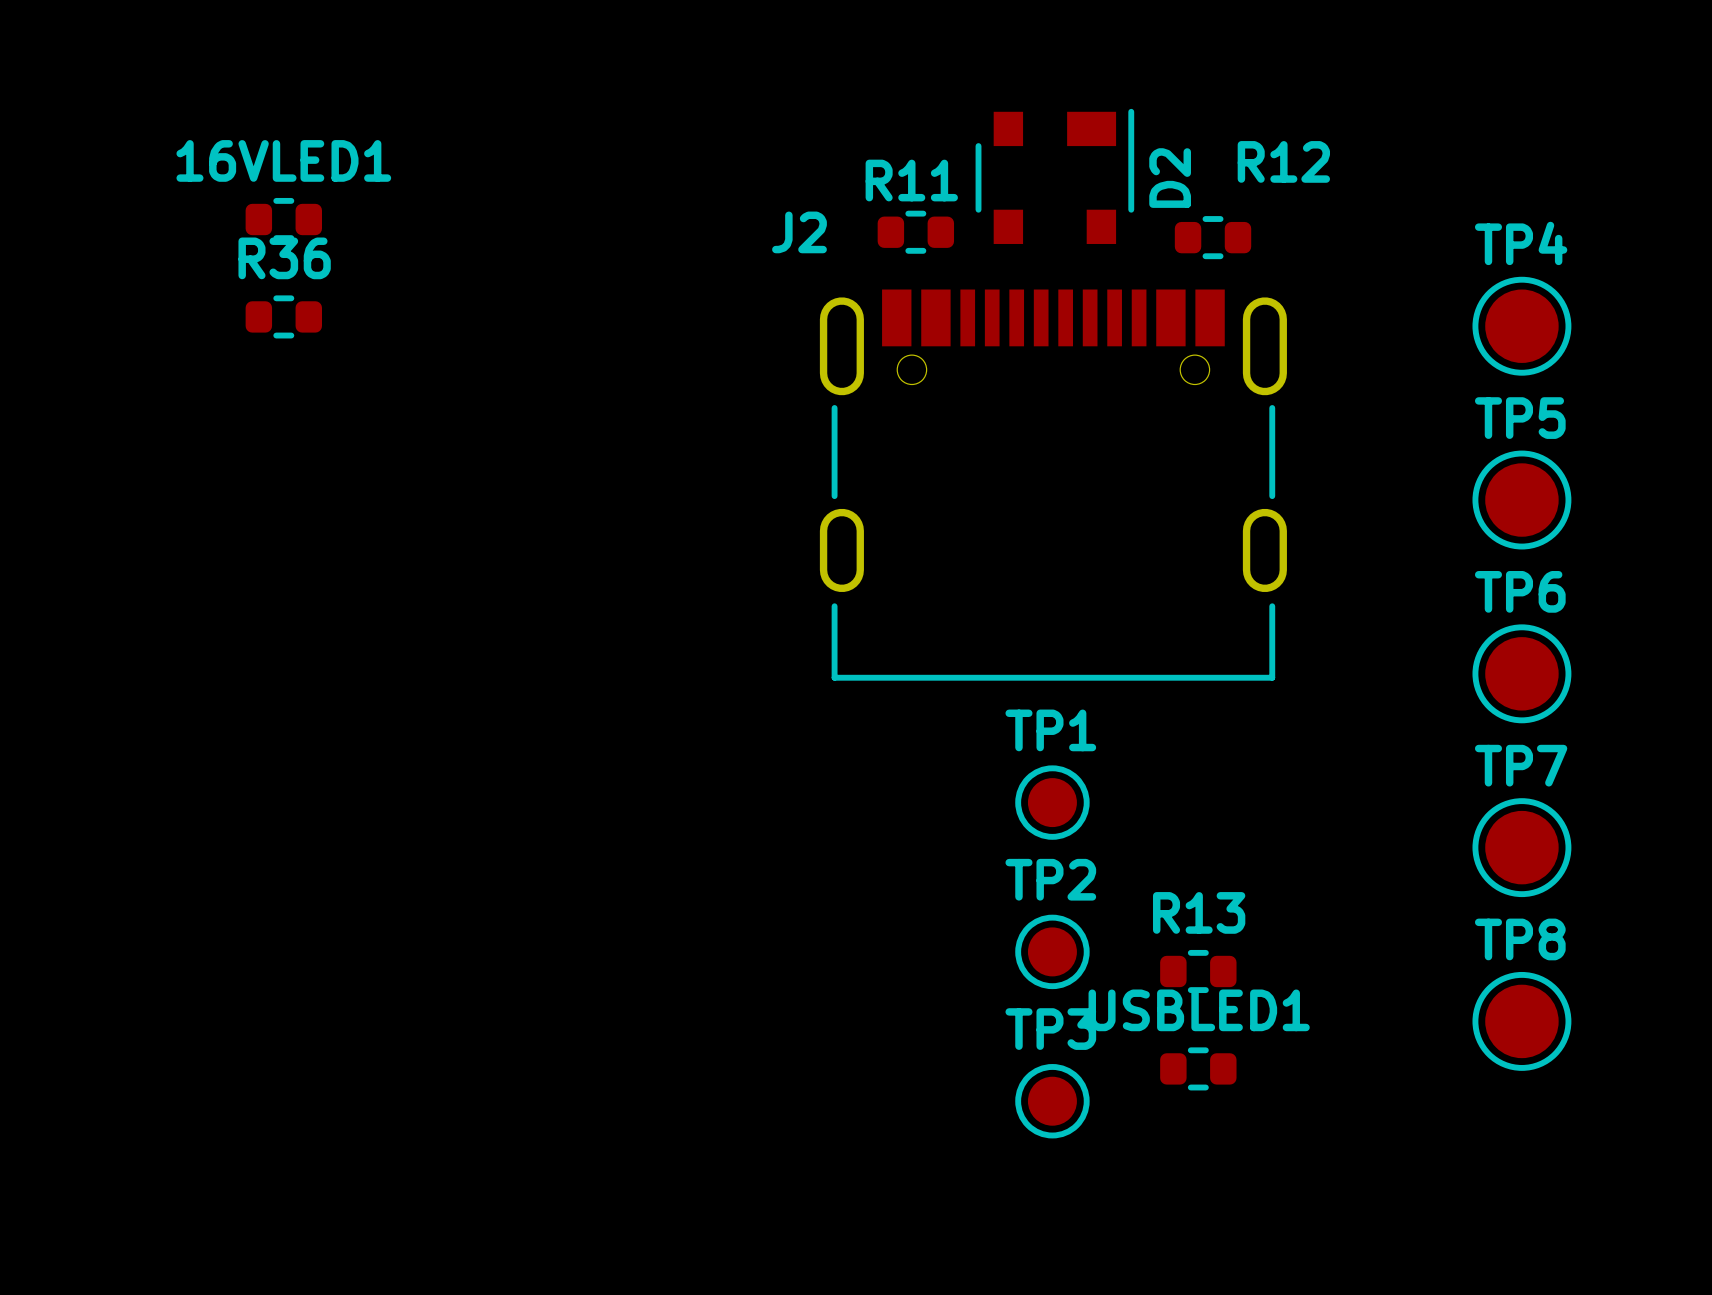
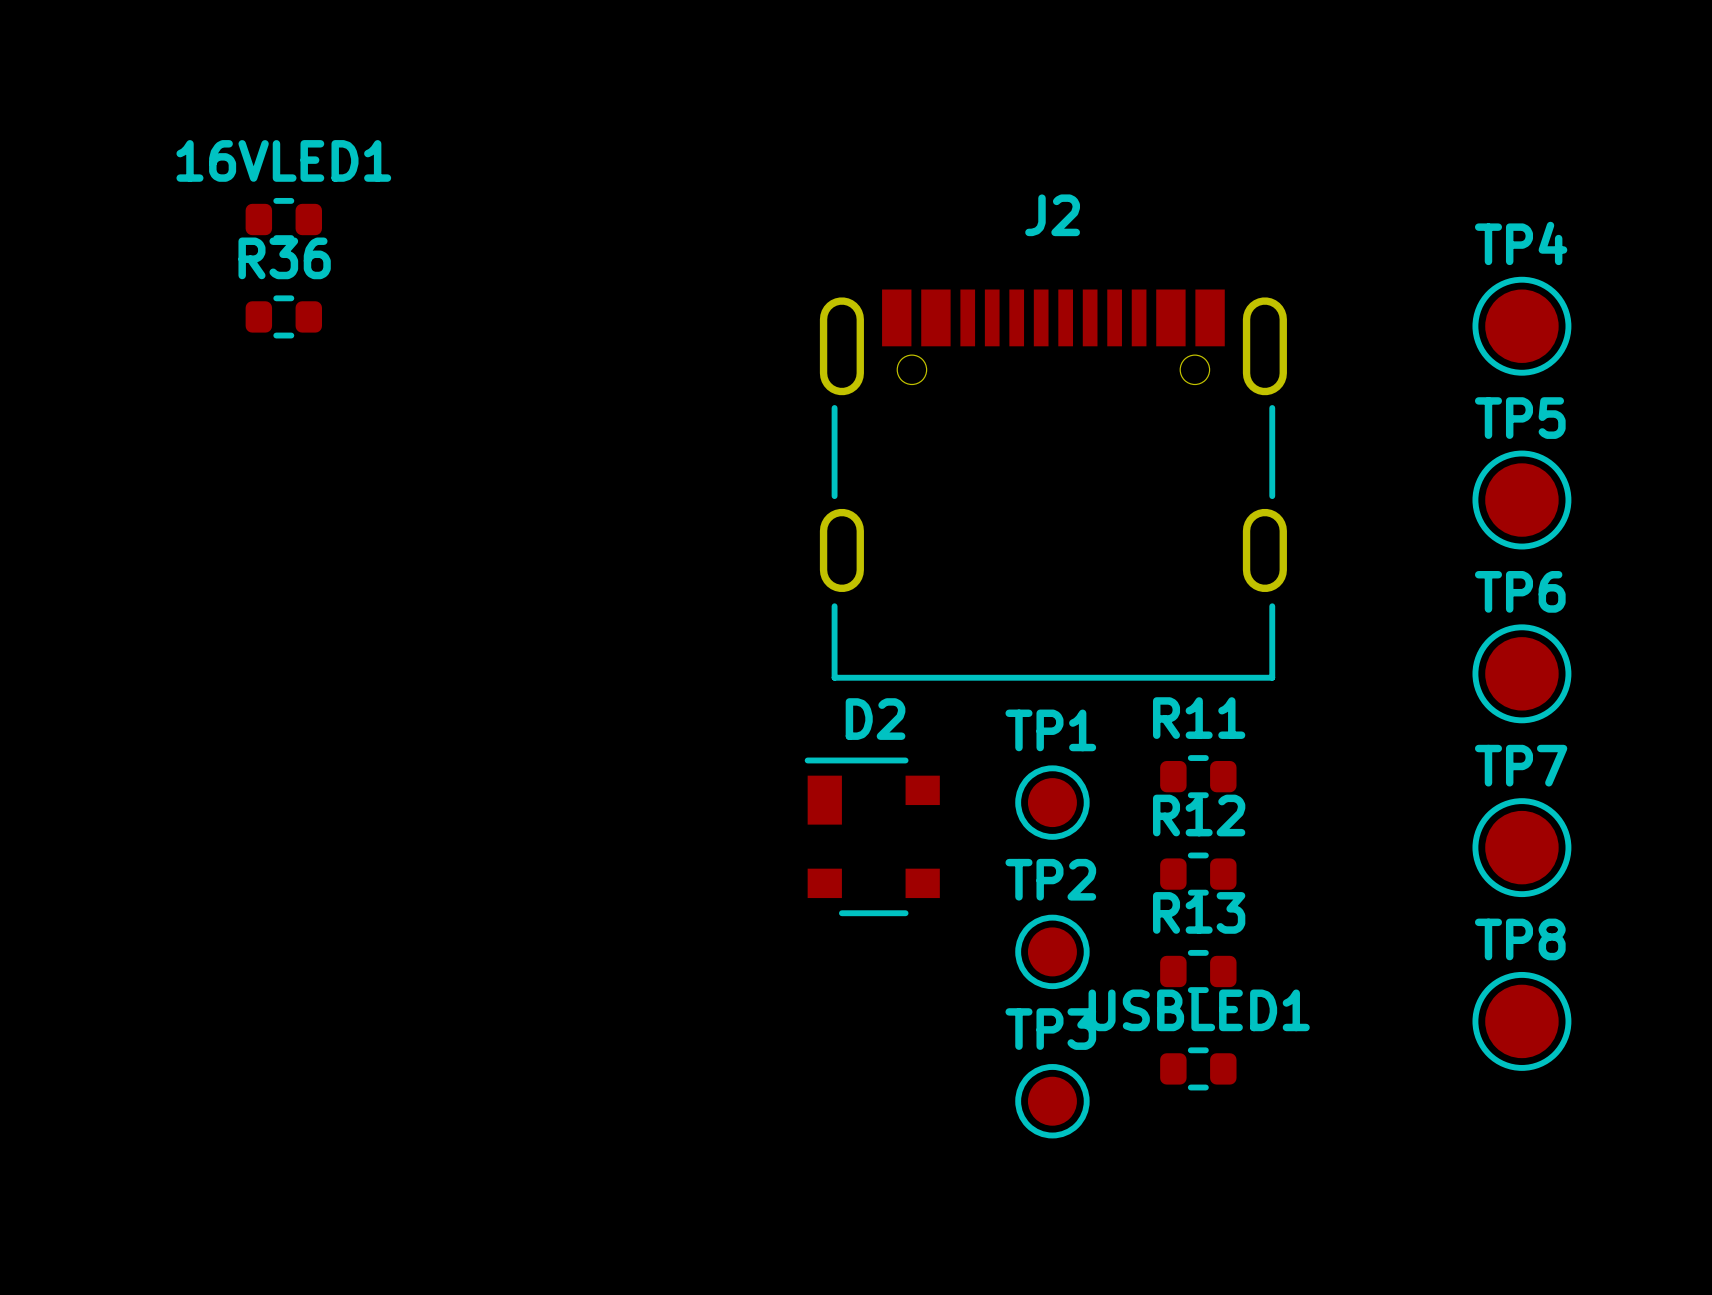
R12 name position: R12 (1283, 161) -> R12 (1199, 815)
D2 rotation: 0° (1054, 176) -> 90° counterclockwise (872, 836)
D2 position: (1054, 176) -> (872, 836)
R11 name position: R11 (911, 180) -> R11 (1199, 718)
J2 name position: J2 (799, 232) -> J2 (1052, 215)
R11 position: (915, 232) -> (1198, 776)
R12 position: (1213, 237) -> (1198, 874)

